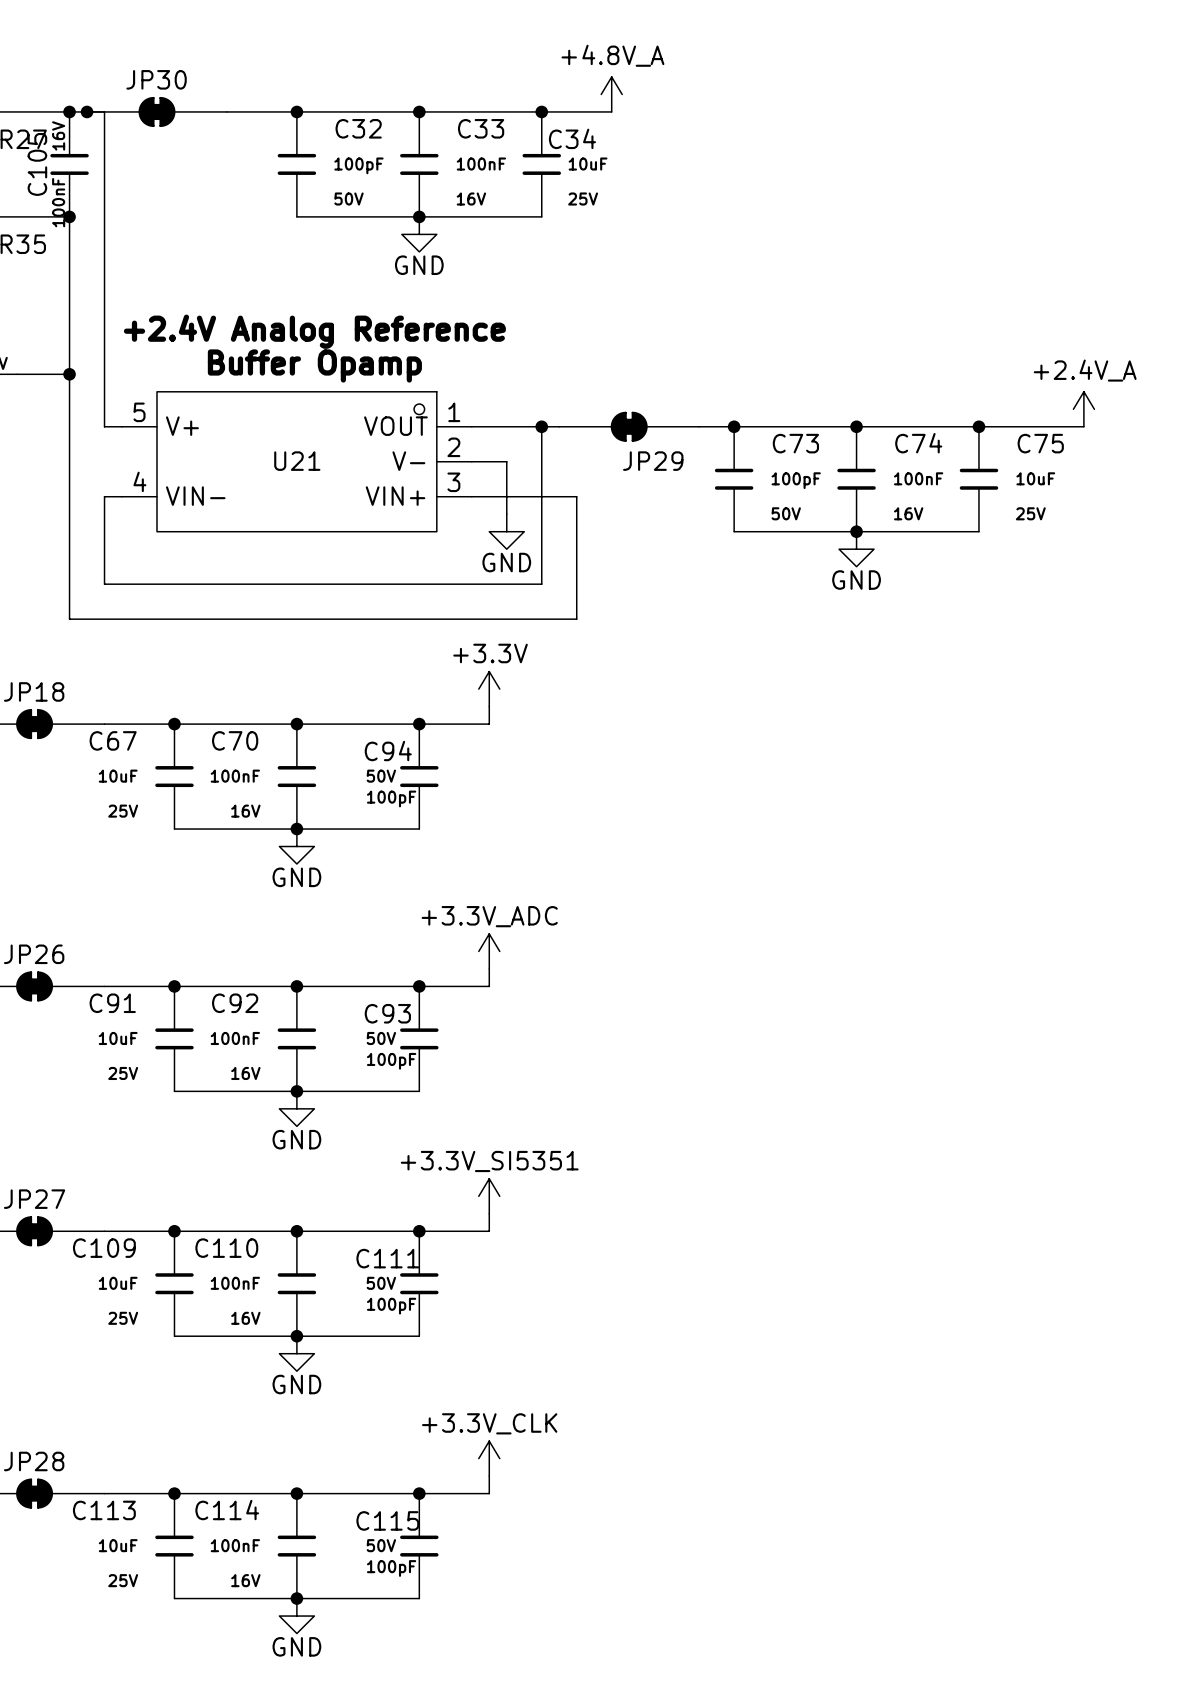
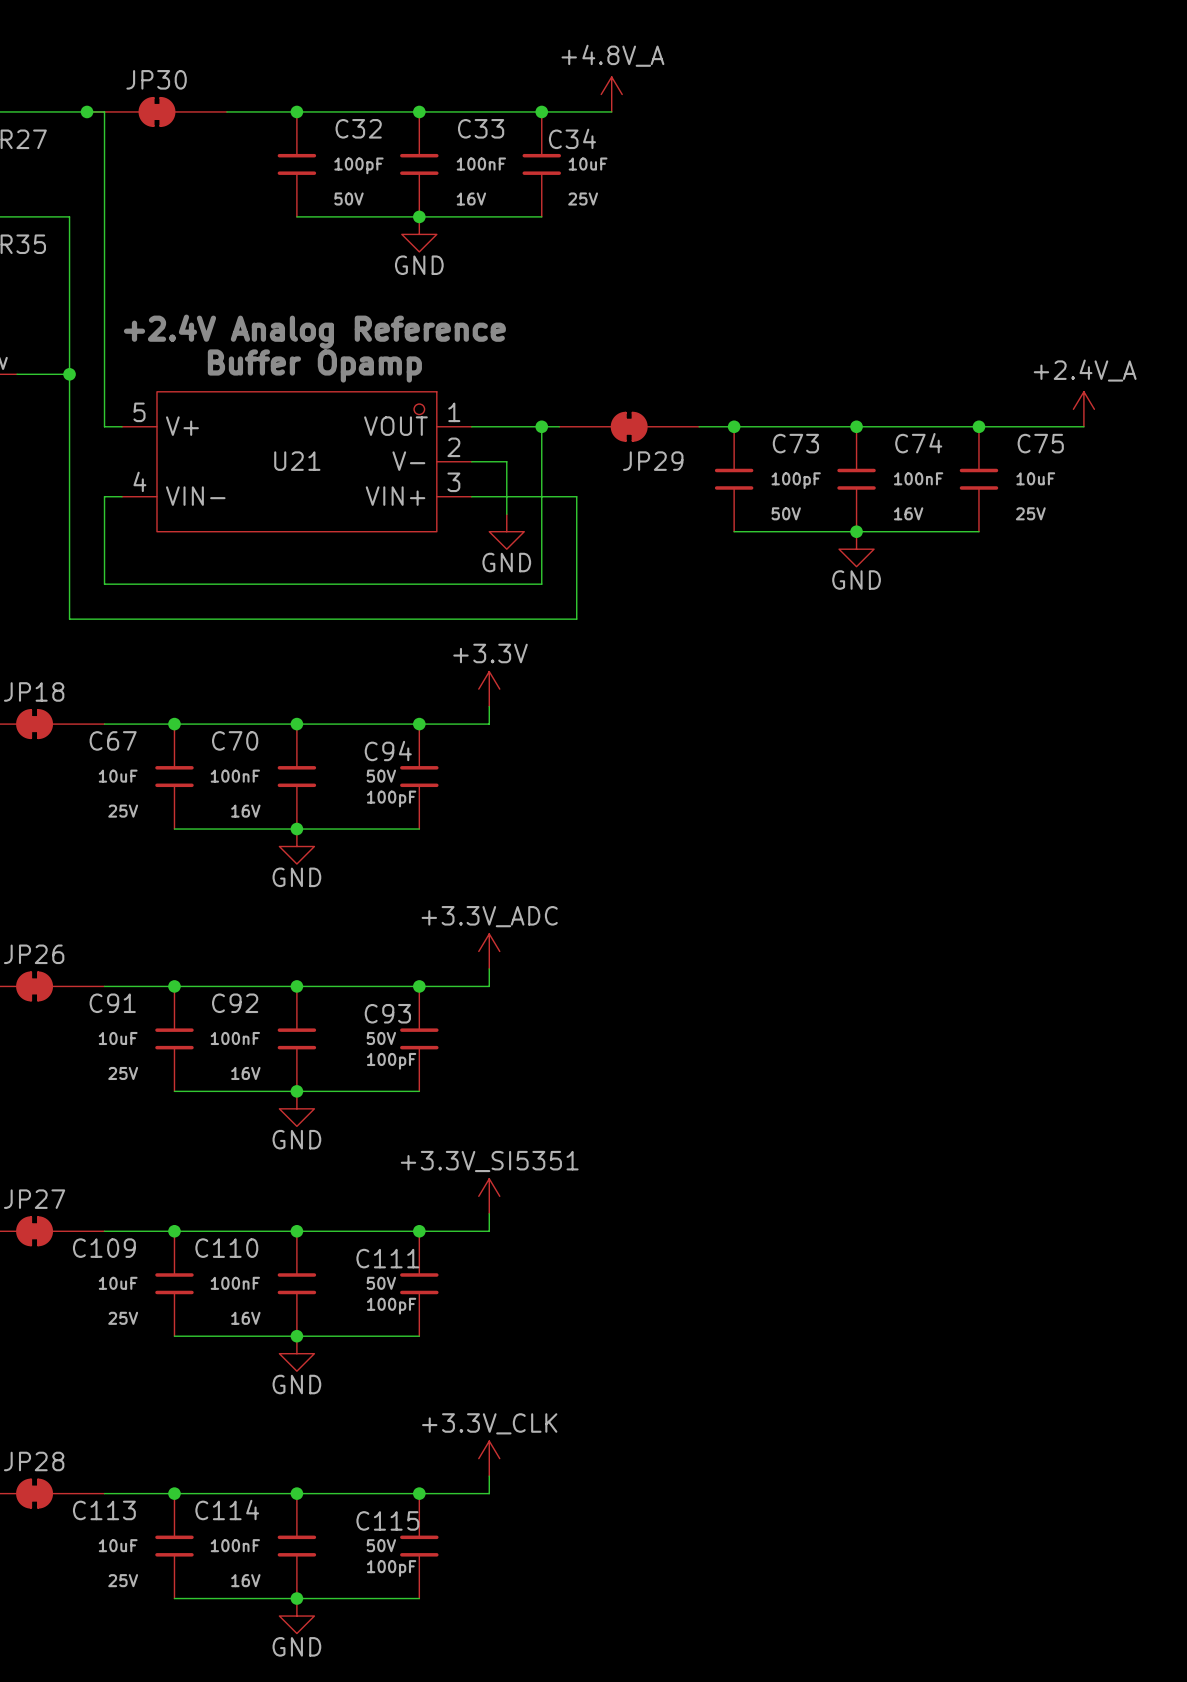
junction: (69, 111) -> none
C105: 100nF (69, 164) -> none
junction: (69, 216) -> none

